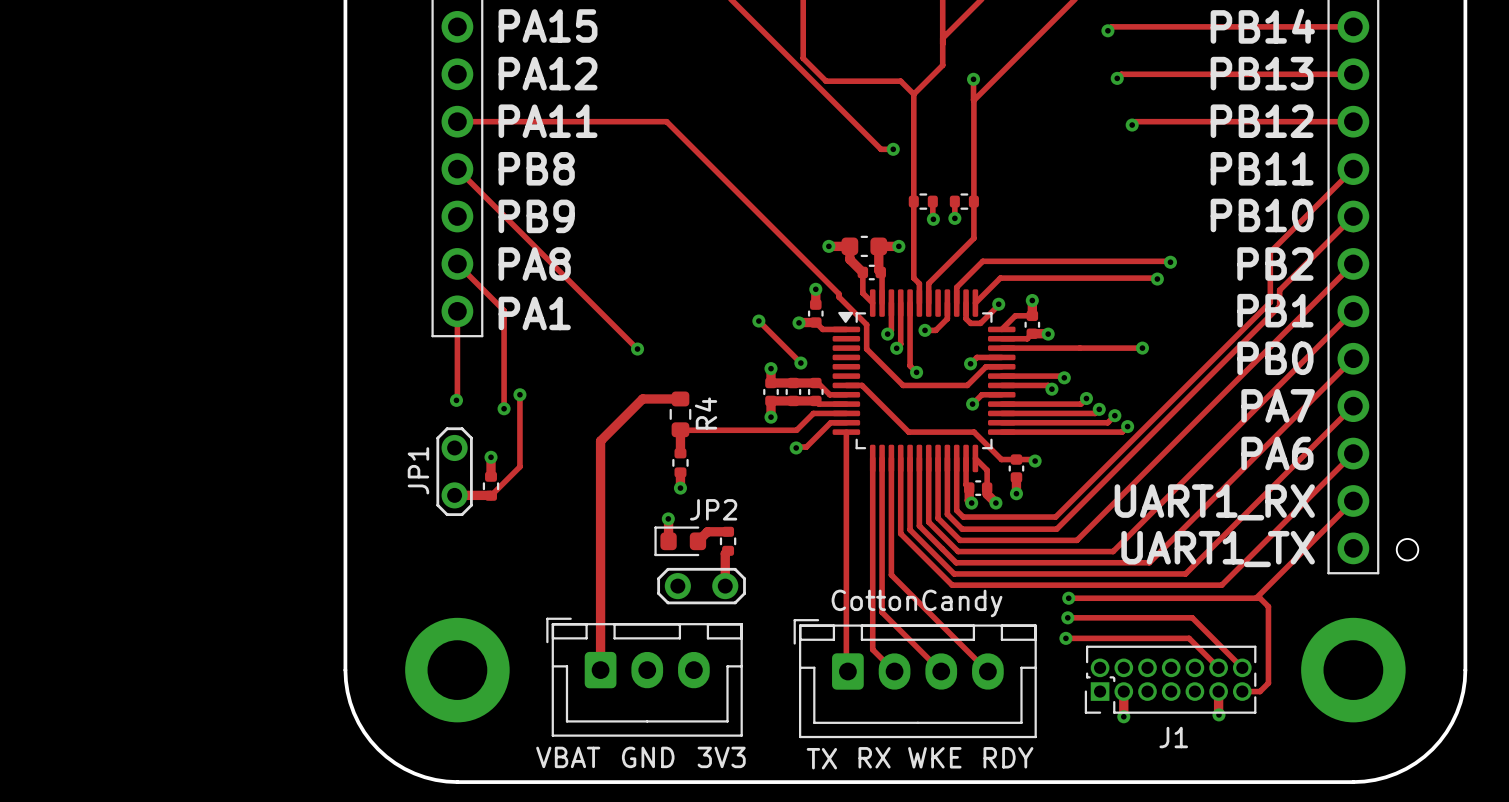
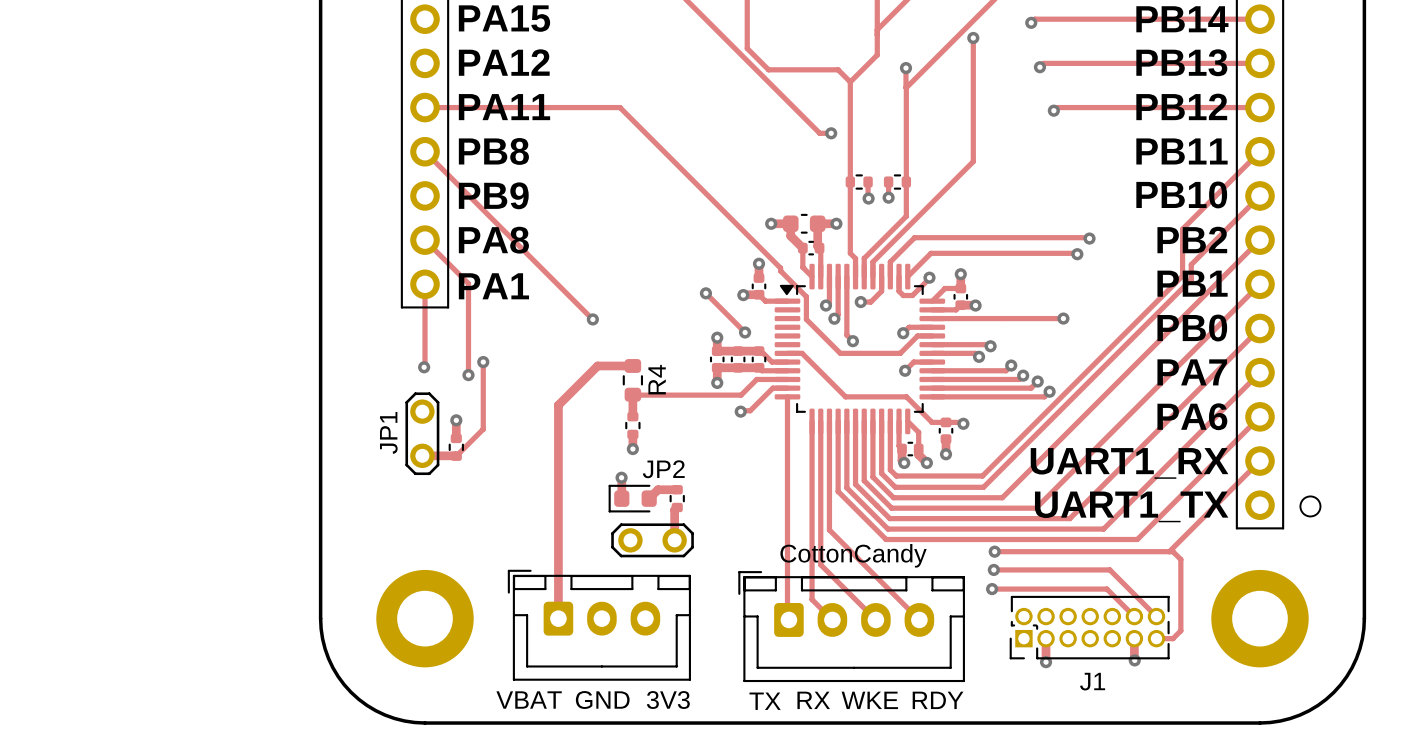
track: none -> (973, 37) (973, 161) (872, 261) (872, 276)
via: none -> (973, 37)

